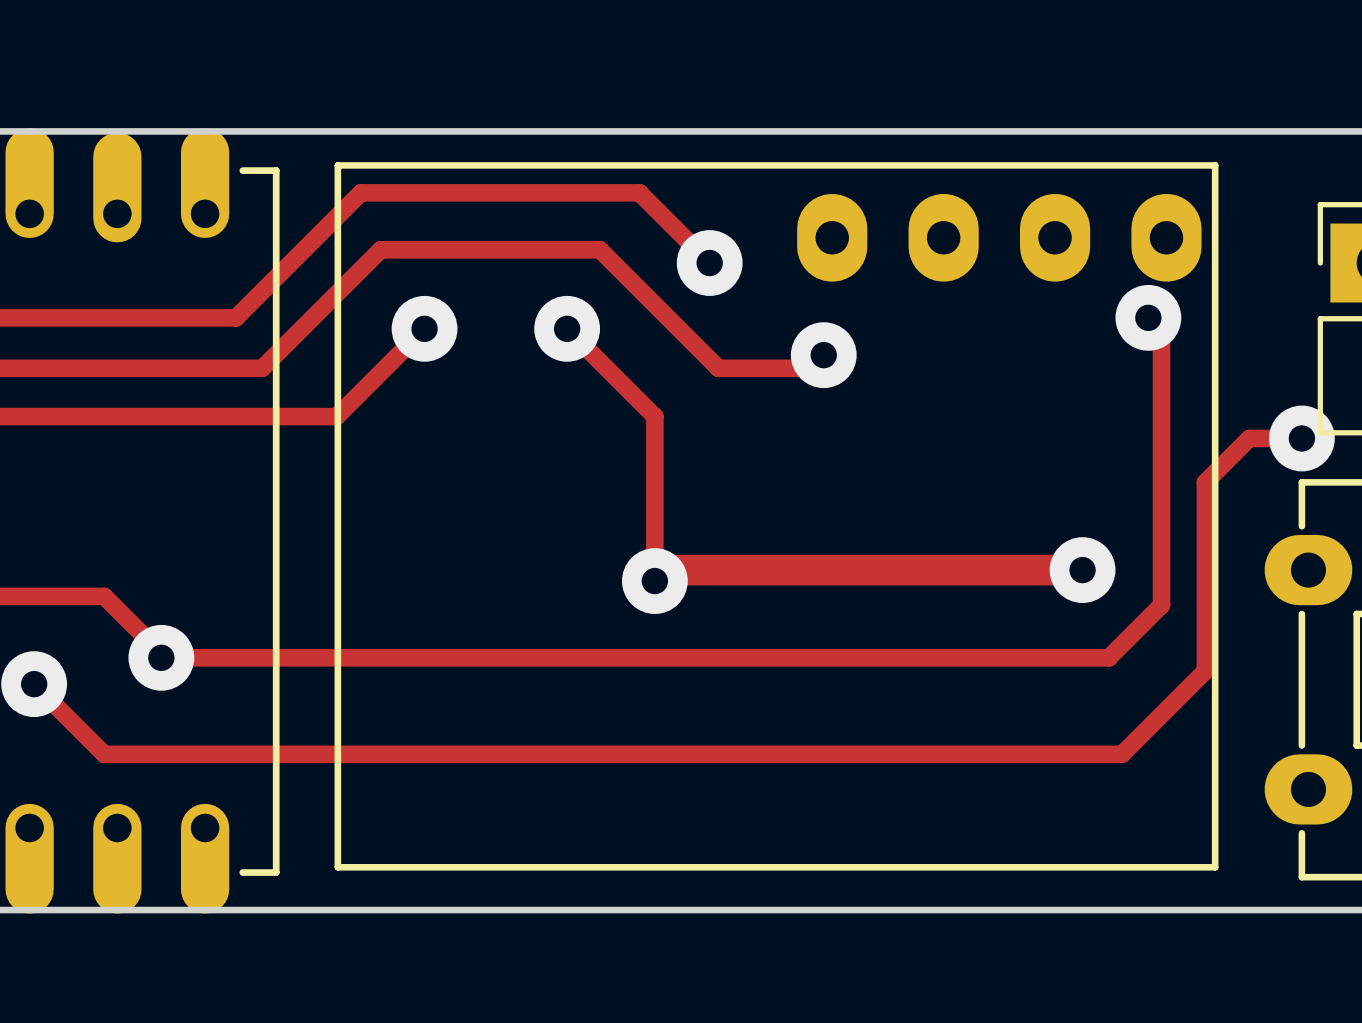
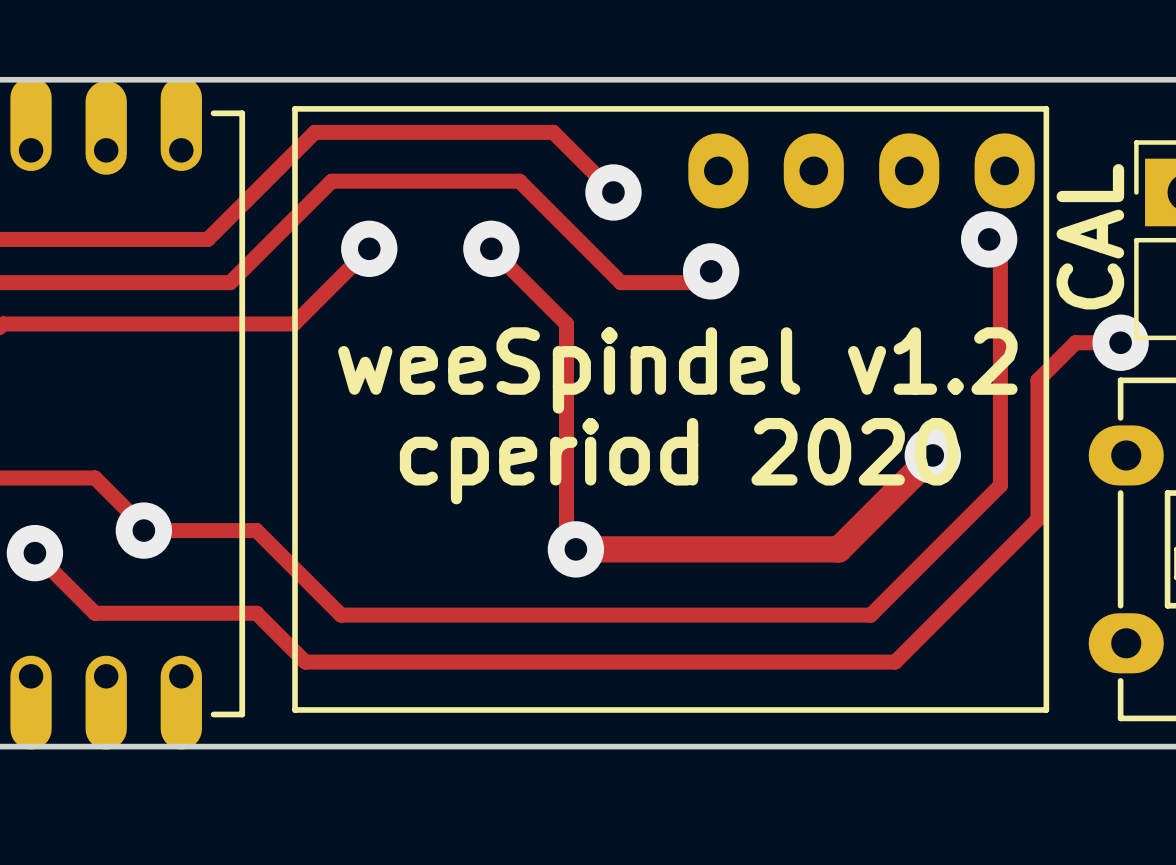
text: none -> CAL (1090, 236)
text: none -> weeSpindel v1.2 (677, 370)
track: (1082, 570) (665, 570) (654, 581) -> (932, 455) (838, 549) (575, 549) (566, 539) (566, 464)
text: none -> cperiod 2020 (679, 461)
via position: (654, 581) -> (575, 549)
track: (1205, 644) (1205, 670) (1122, 754) (292, 754) -> (1037, 519) (895, 662) (305, 662) (256, 613)
track: (292, 657) (1108, 657) -> (256, 530) (341, 615) (870, 615) (955, 530)

